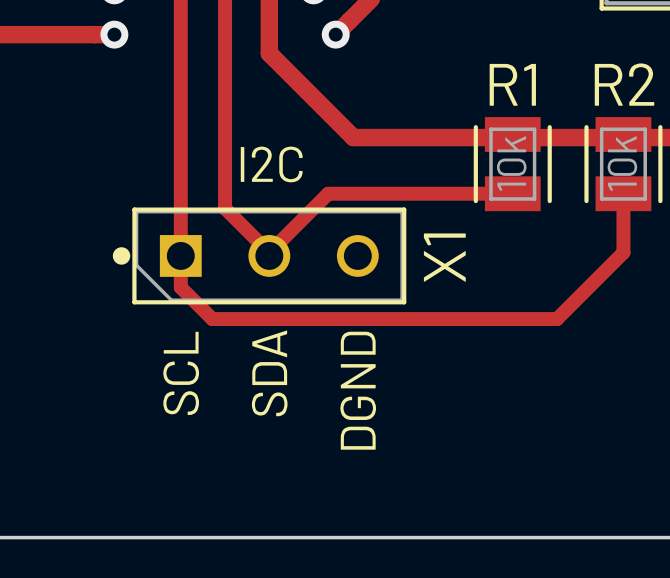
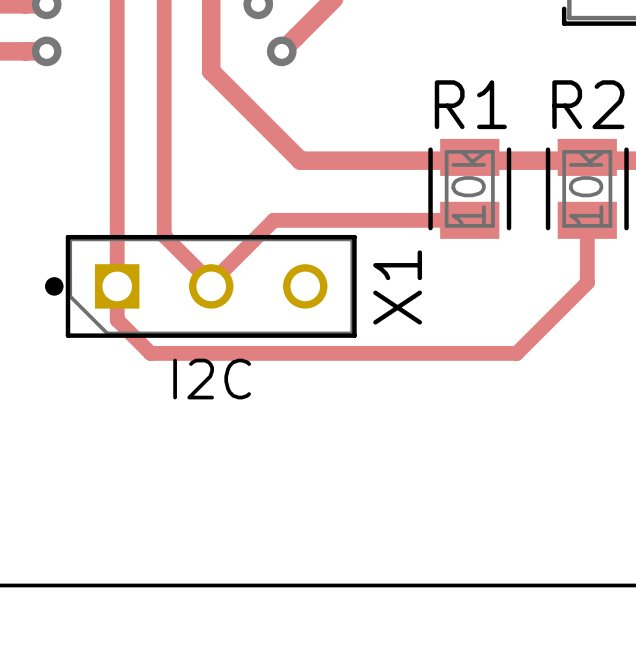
X1 value position: I2C (271, 164) -> I2C (212, 379)
text: SCL (181, 373) -> none
text: SDA (269, 373) -> none
text: DGND (358, 390) -> none

